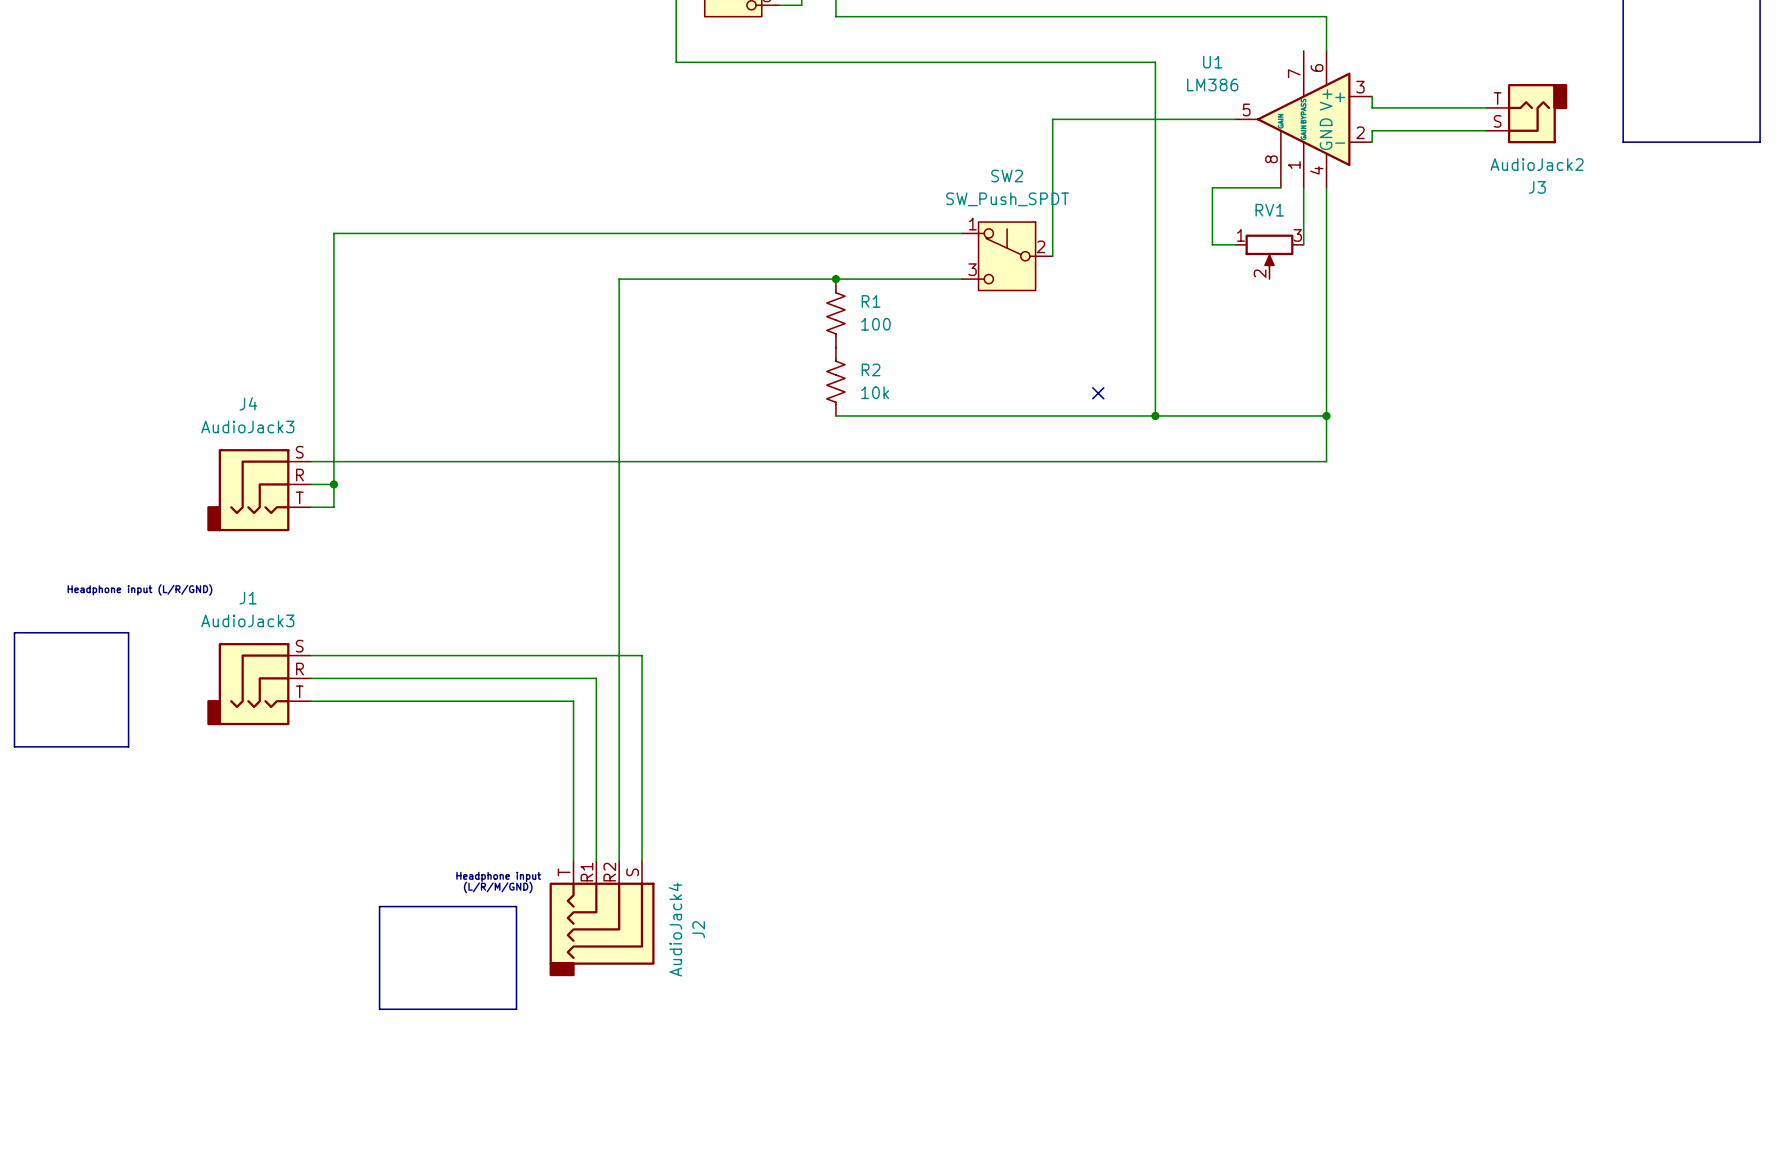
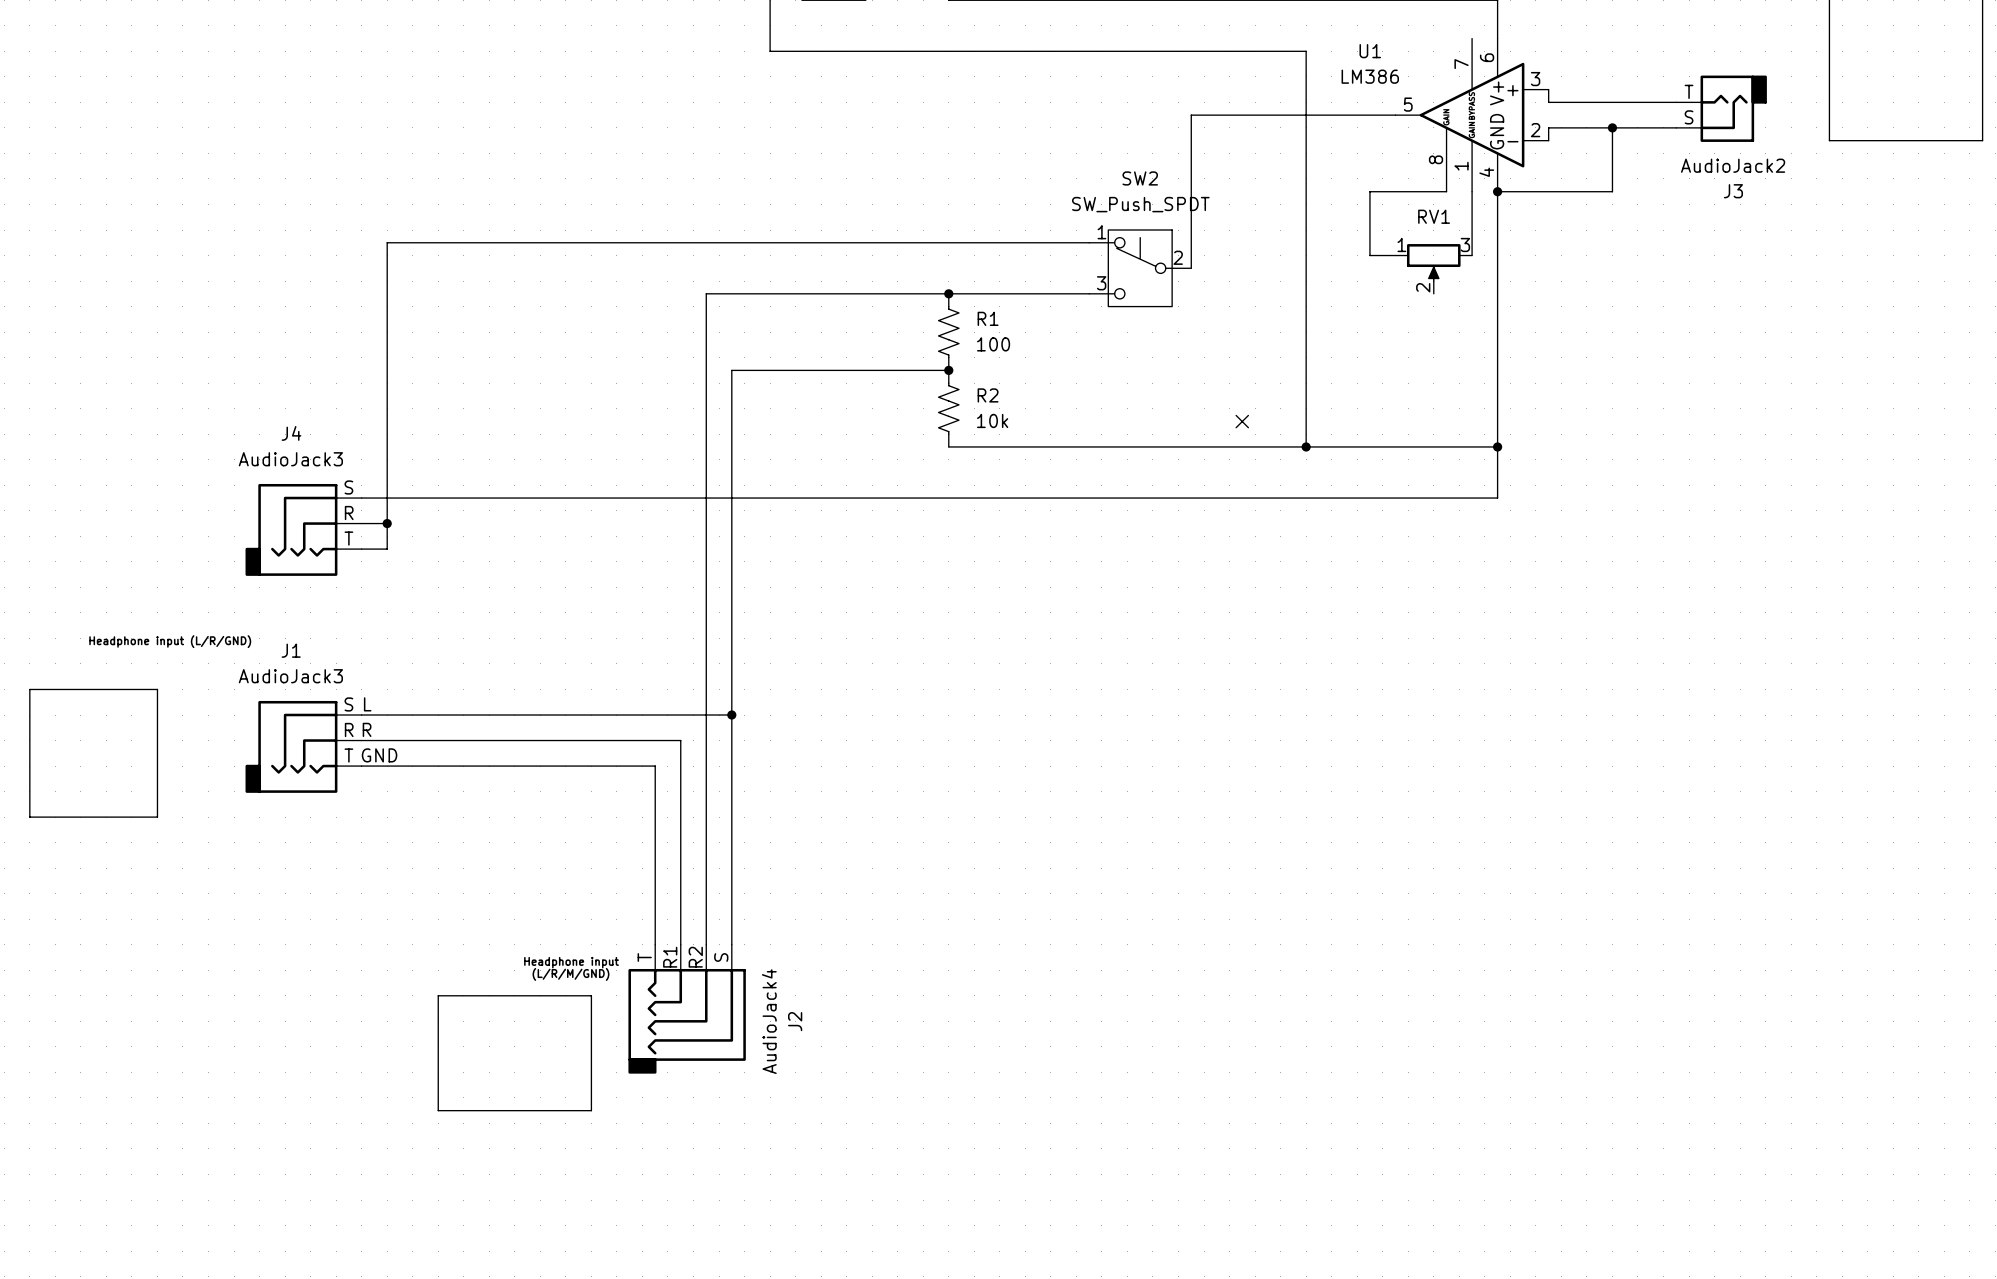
wire: none -> (1612, 127) (1612, 191) (1497, 191)
junction: none -> (1612, 127)
junction: none -> (1497, 191)
wire: none -> (948, 370) (731, 370) (731, 715)
junction: none -> (948, 370)
text: none -> L (367, 704)
junction: none -> (731, 715)
text: none -> R (367, 729)
text: none -> GND (379, 755)

